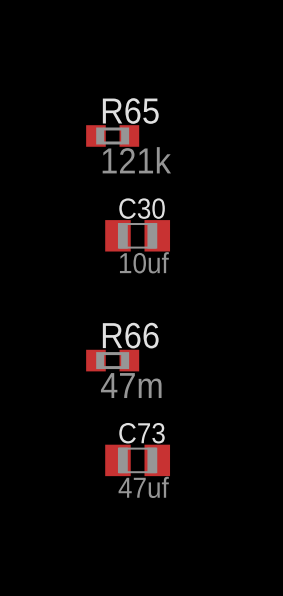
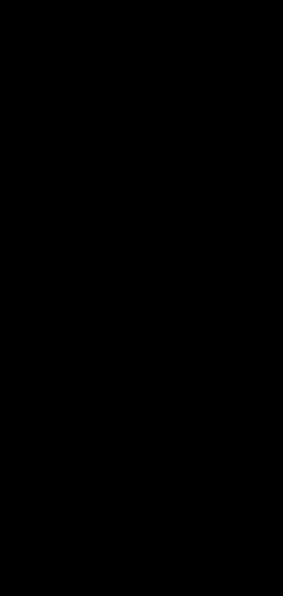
R65: 121k (112, 135) -> none
C30: 10uf (137, 235) -> none
R66: 47m (112, 360) -> none
C73: 47uf (137, 460) -> none

